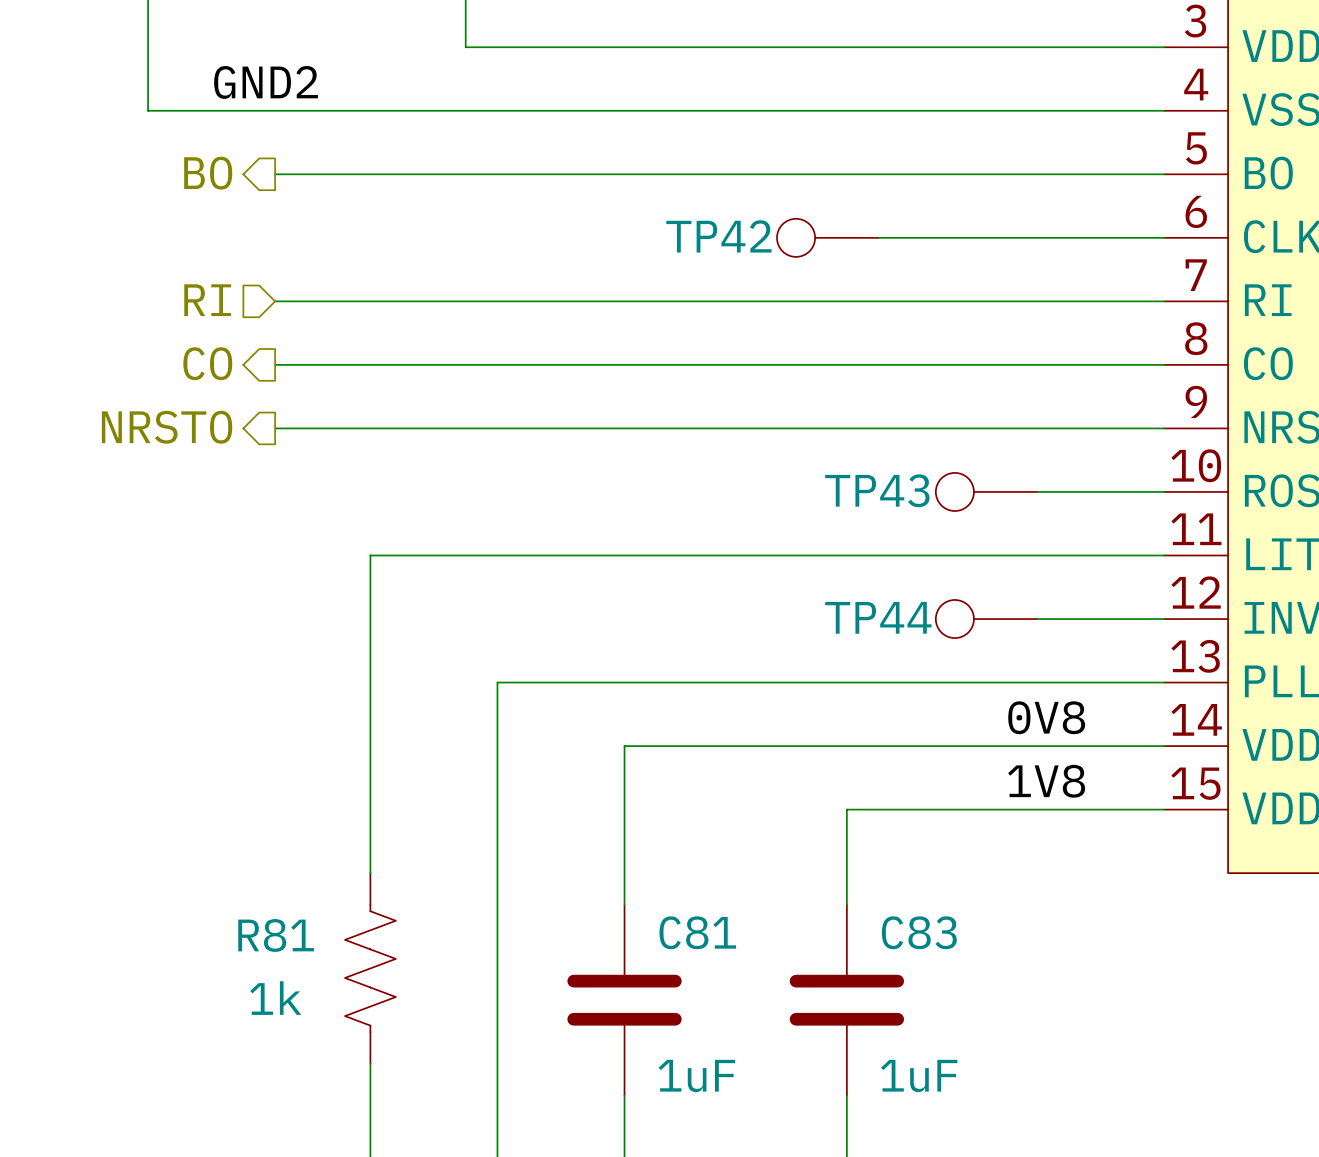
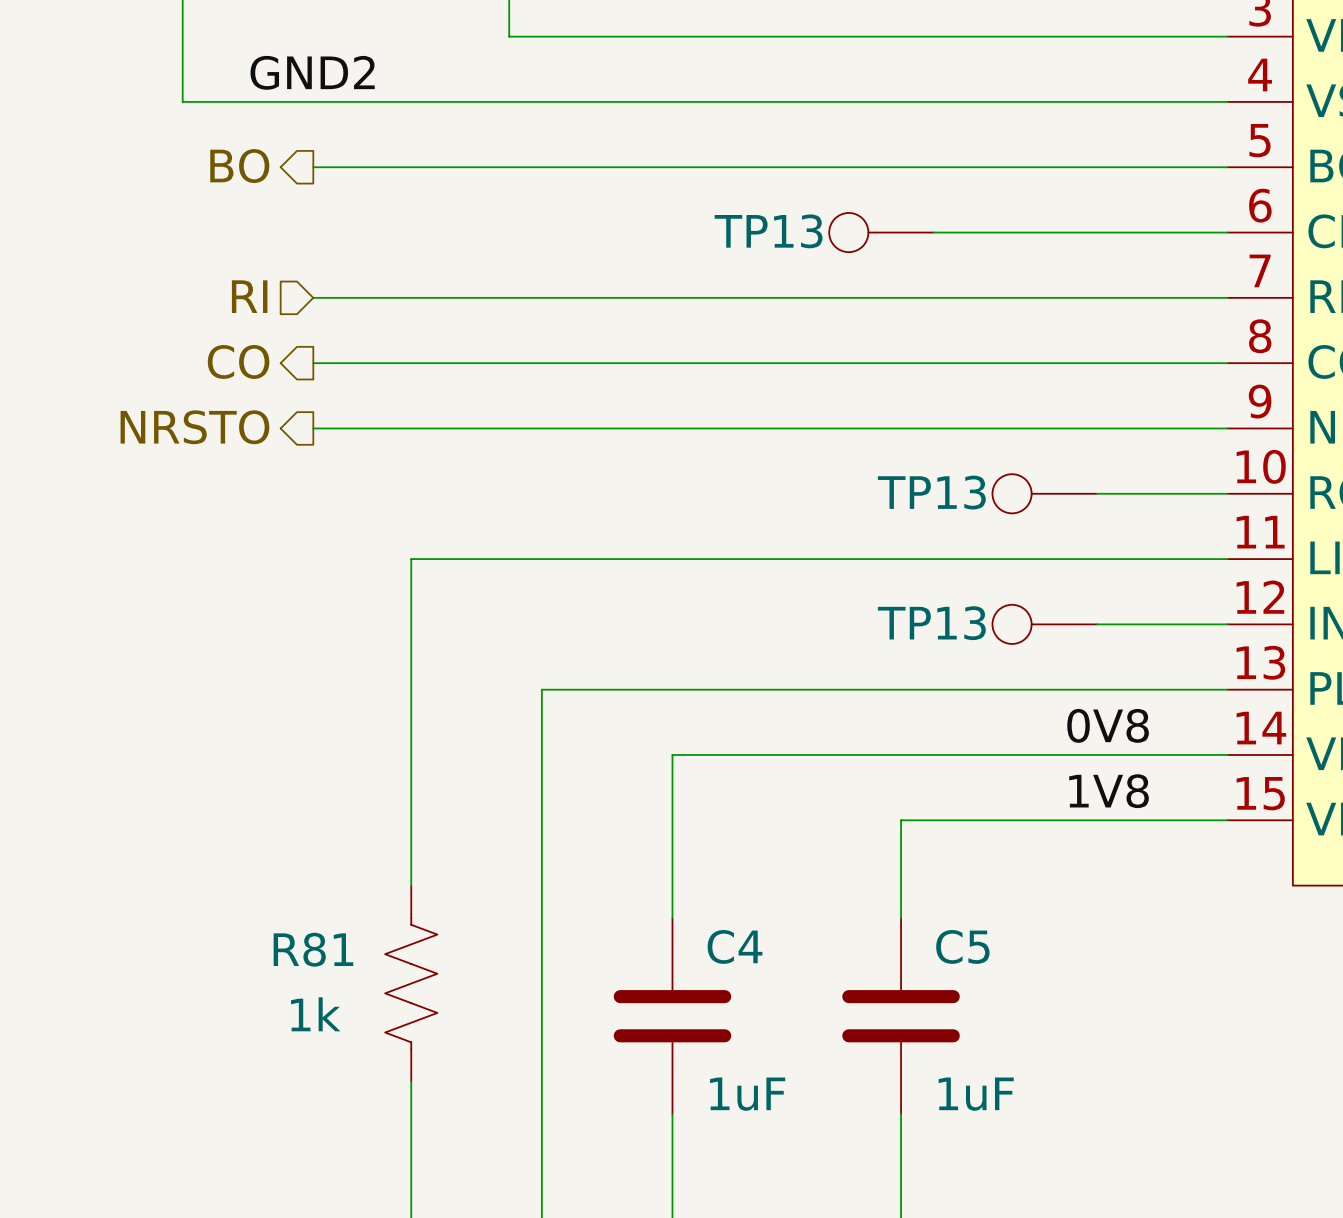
TP42 name: TP42 (718, 236) -> TP13 (768, 231)
TP43 name: TP43 (877, 490) -> TP13 (931, 492)
TP44 name: TP44 (878, 617) -> TP13 (931, 623)
C81 name: C81 (697, 932) -> C4 (735, 946)
C83 name: C83 (919, 932) -> C5 (962, 946)

